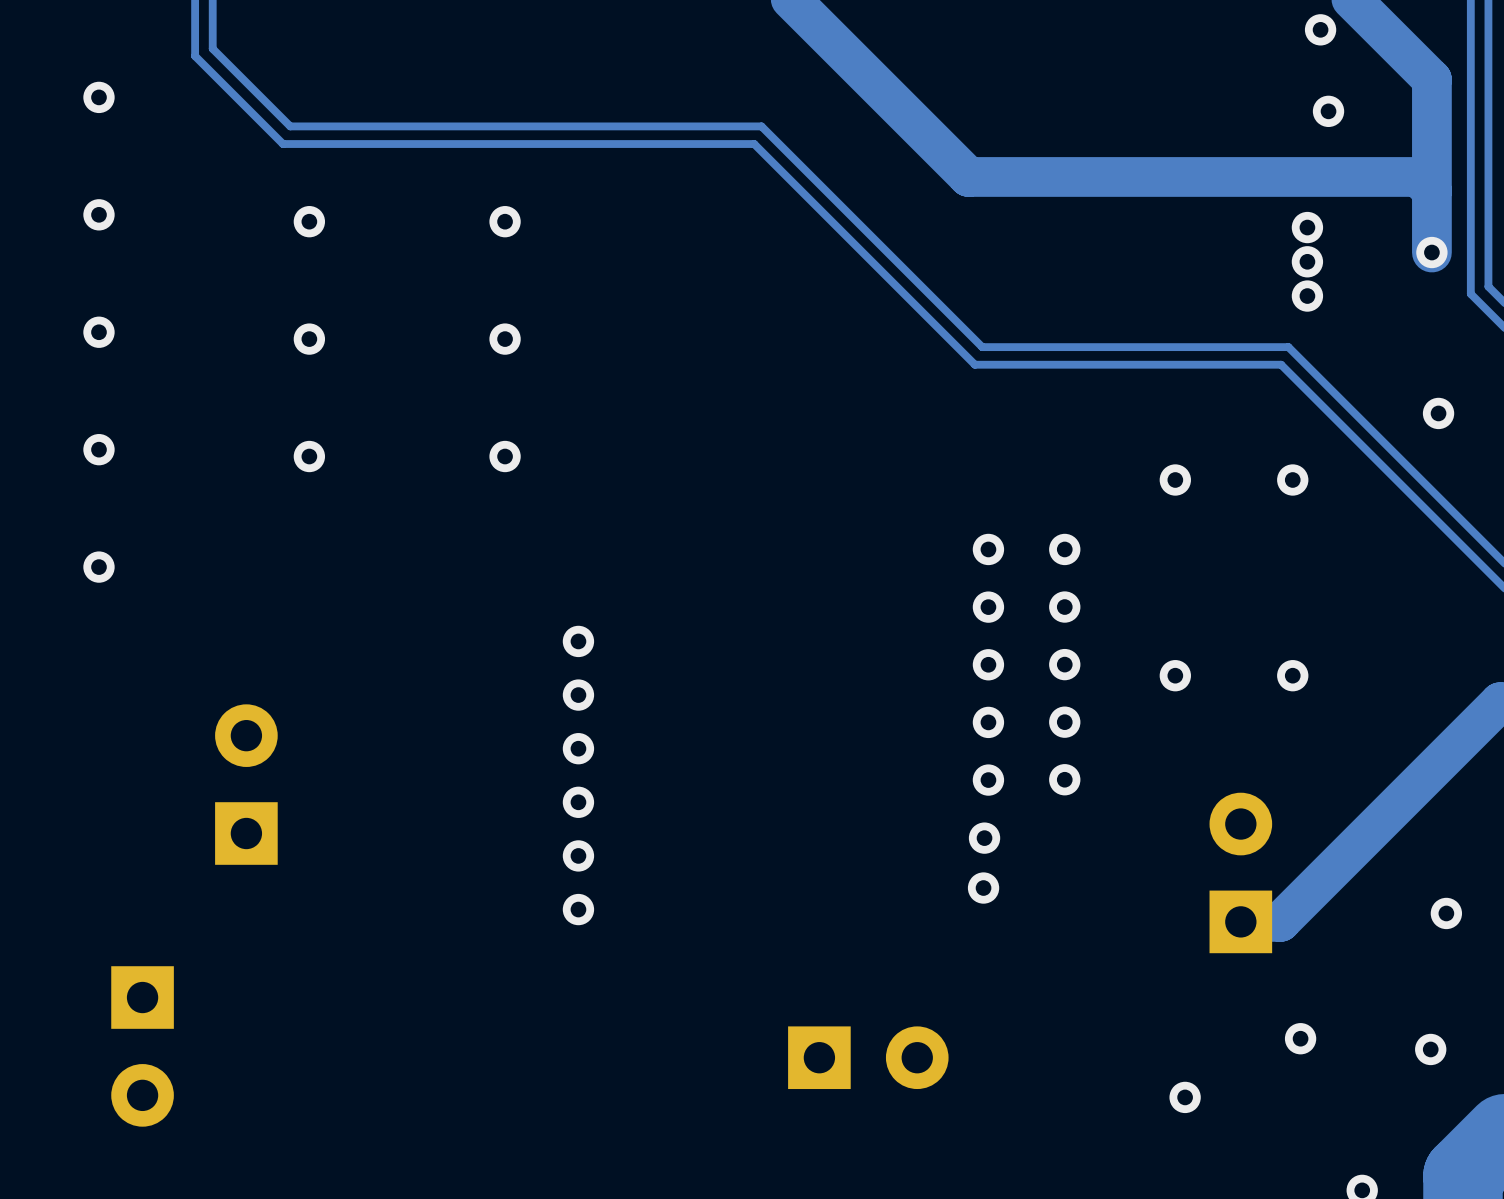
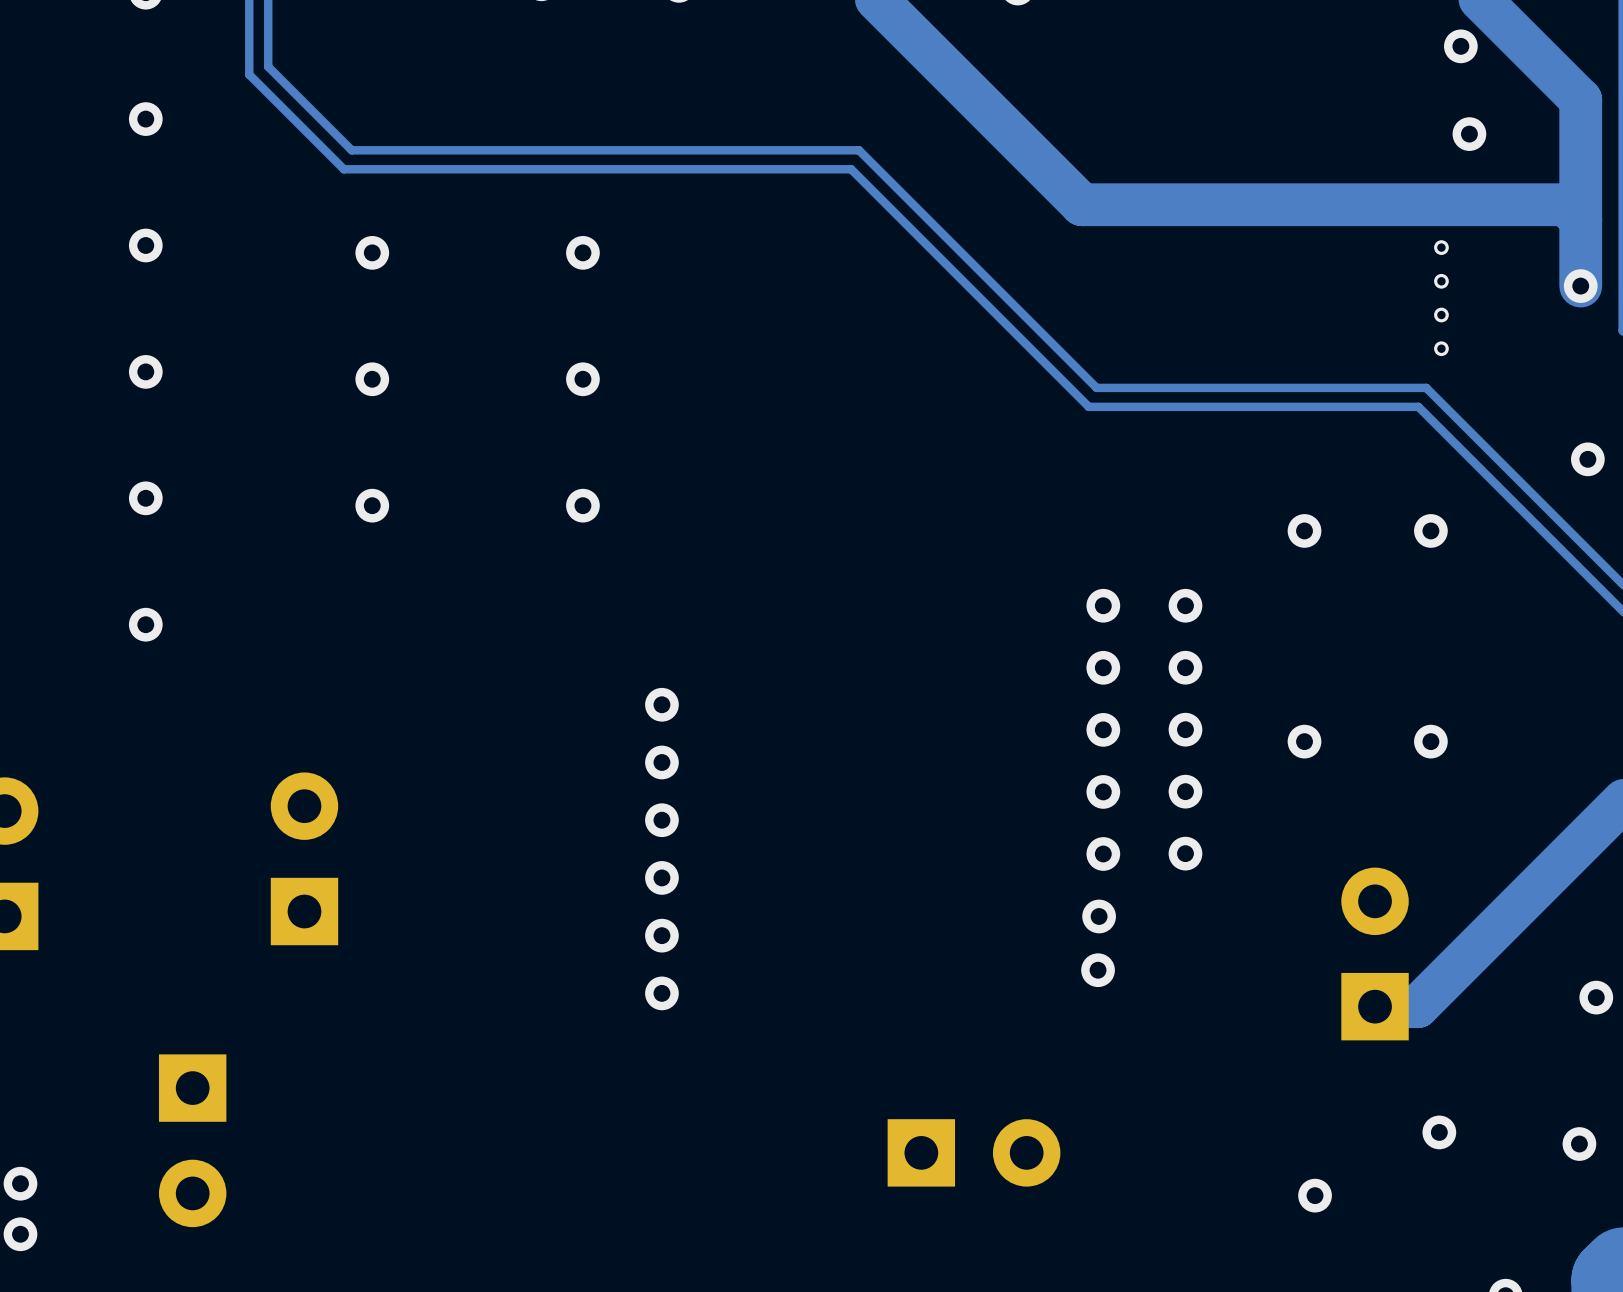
via: none -> (1441, 247)
via: (1307, 227) -> none
via: none -> (1441, 281)
via: (1307, 261) -> none
via: none -> (1441, 315)
via: (1307, 296) -> none
via: none -> (1441, 348)

